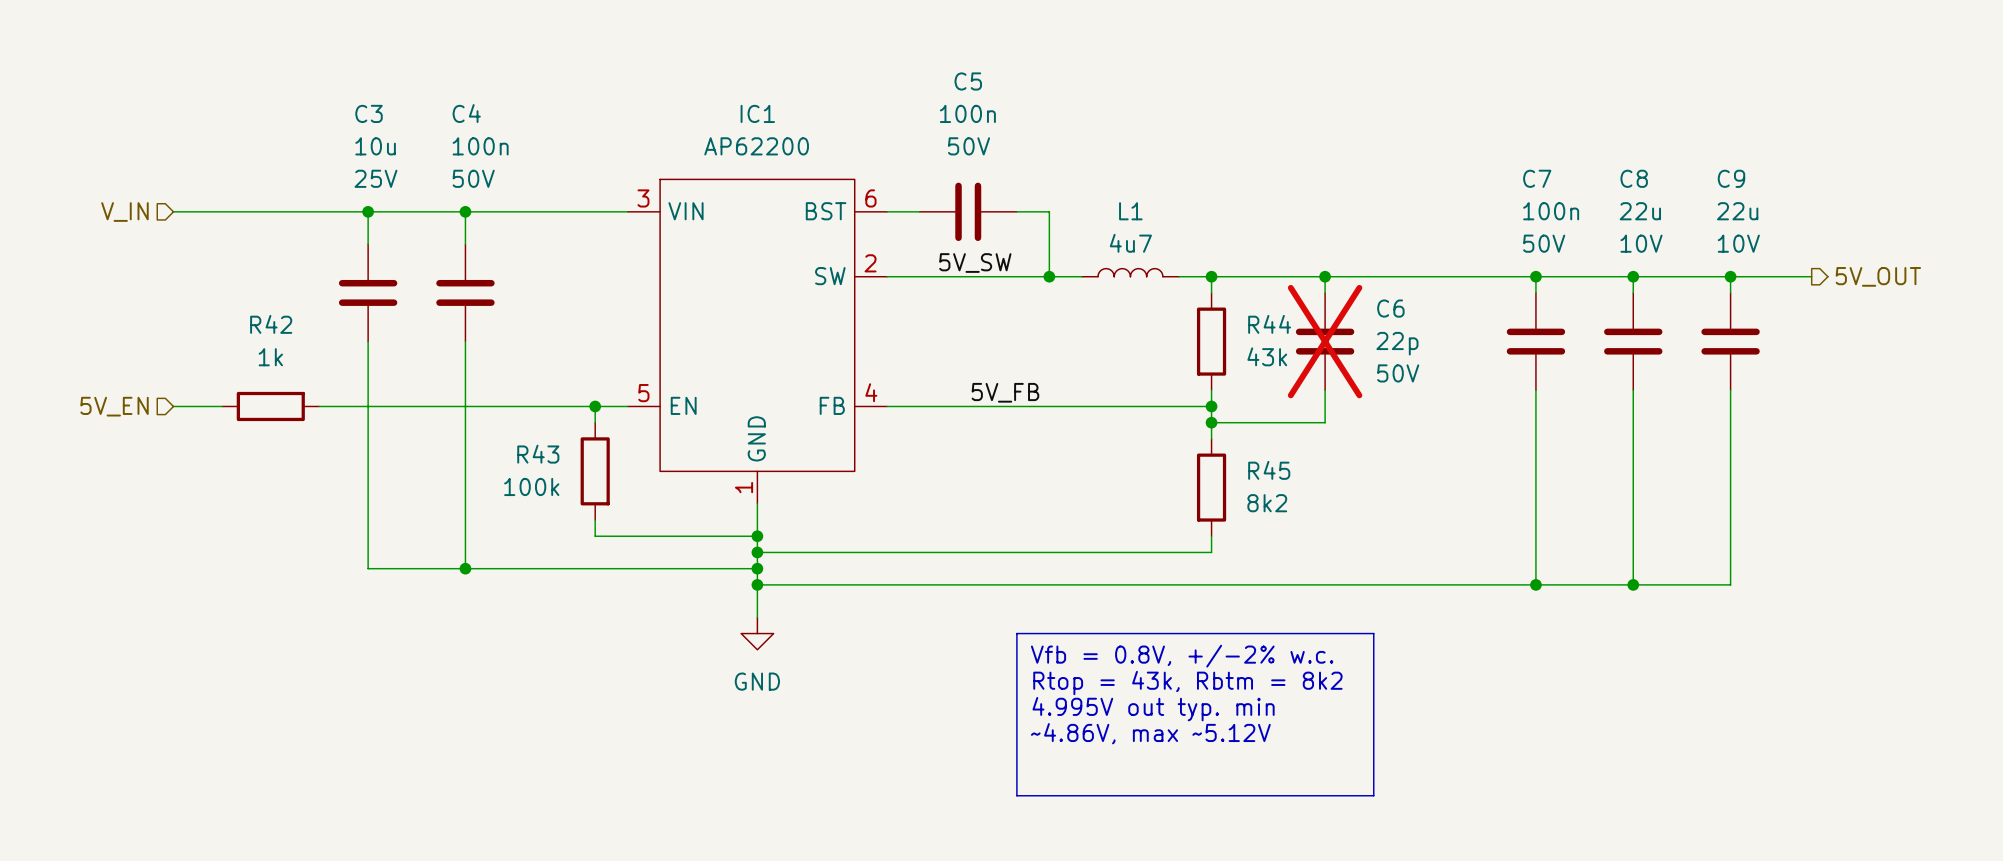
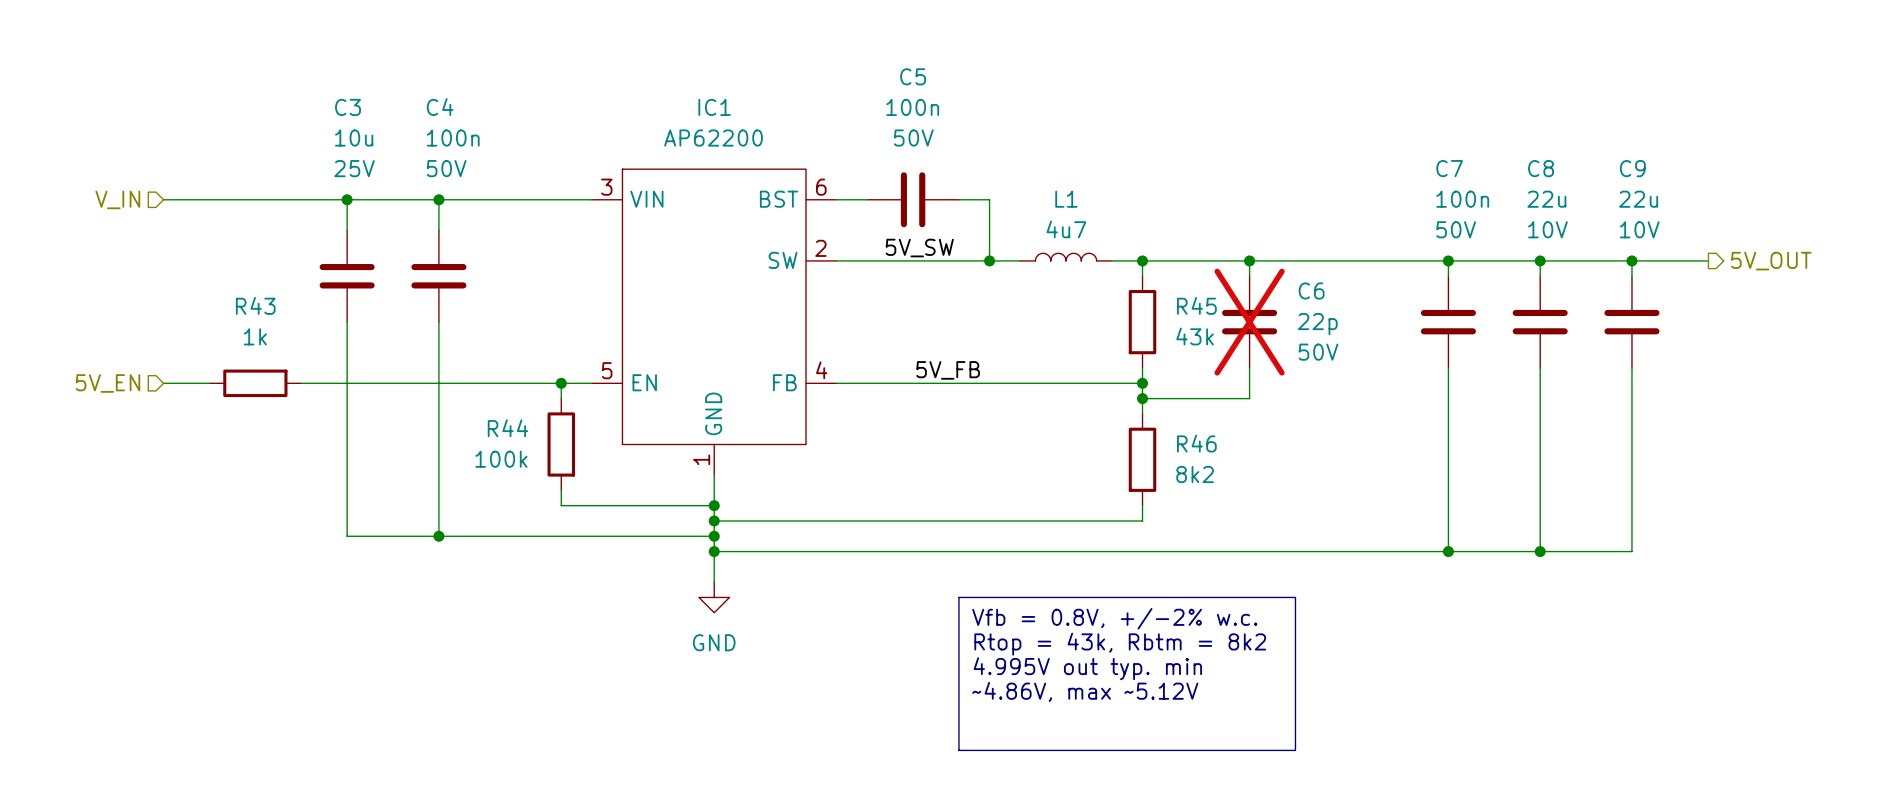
R42 name: R42 (271, 324) -> R43 (255, 305)
R44 name: R44 (1269, 324) -> R45 (1196, 305)
R43 name: R43 (538, 454) -> R44 (508, 428)
R45 name: R45 (1269, 470) -> R46 (1196, 443)

